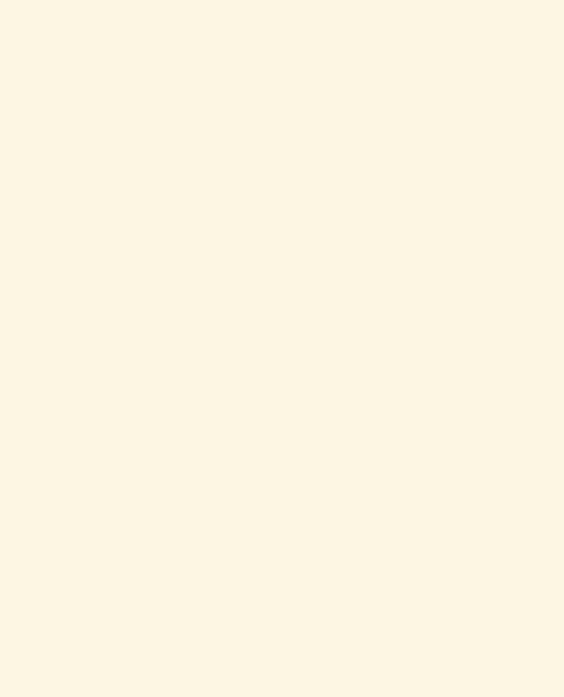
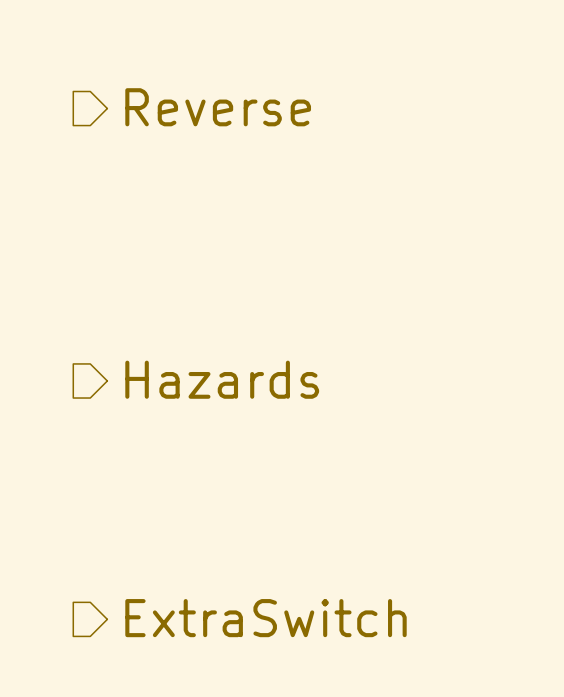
hierarchical label: none -> Reverse (218, 107)
hierarchical label: none -> Hazards (222, 379)
hierarchical label: none -> ExtraSwitch (265, 618)

